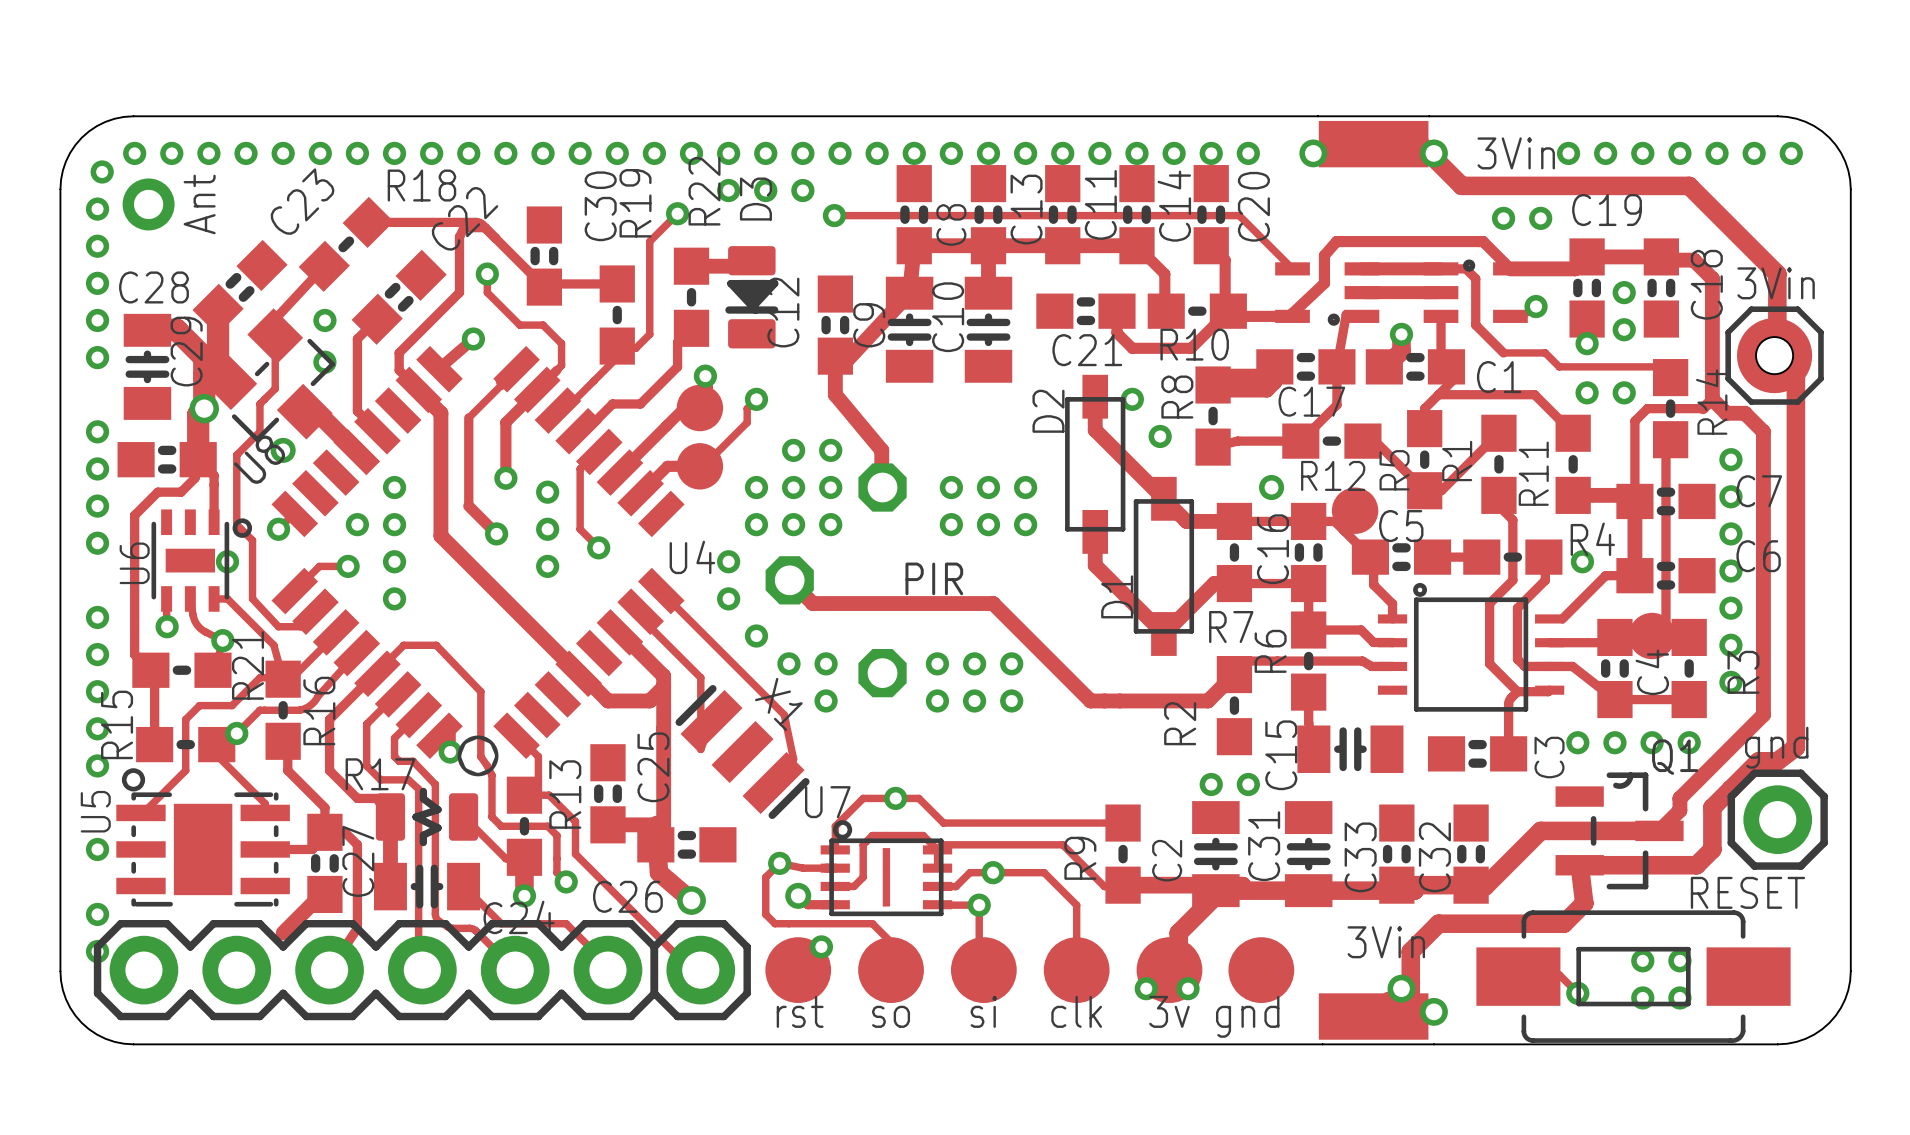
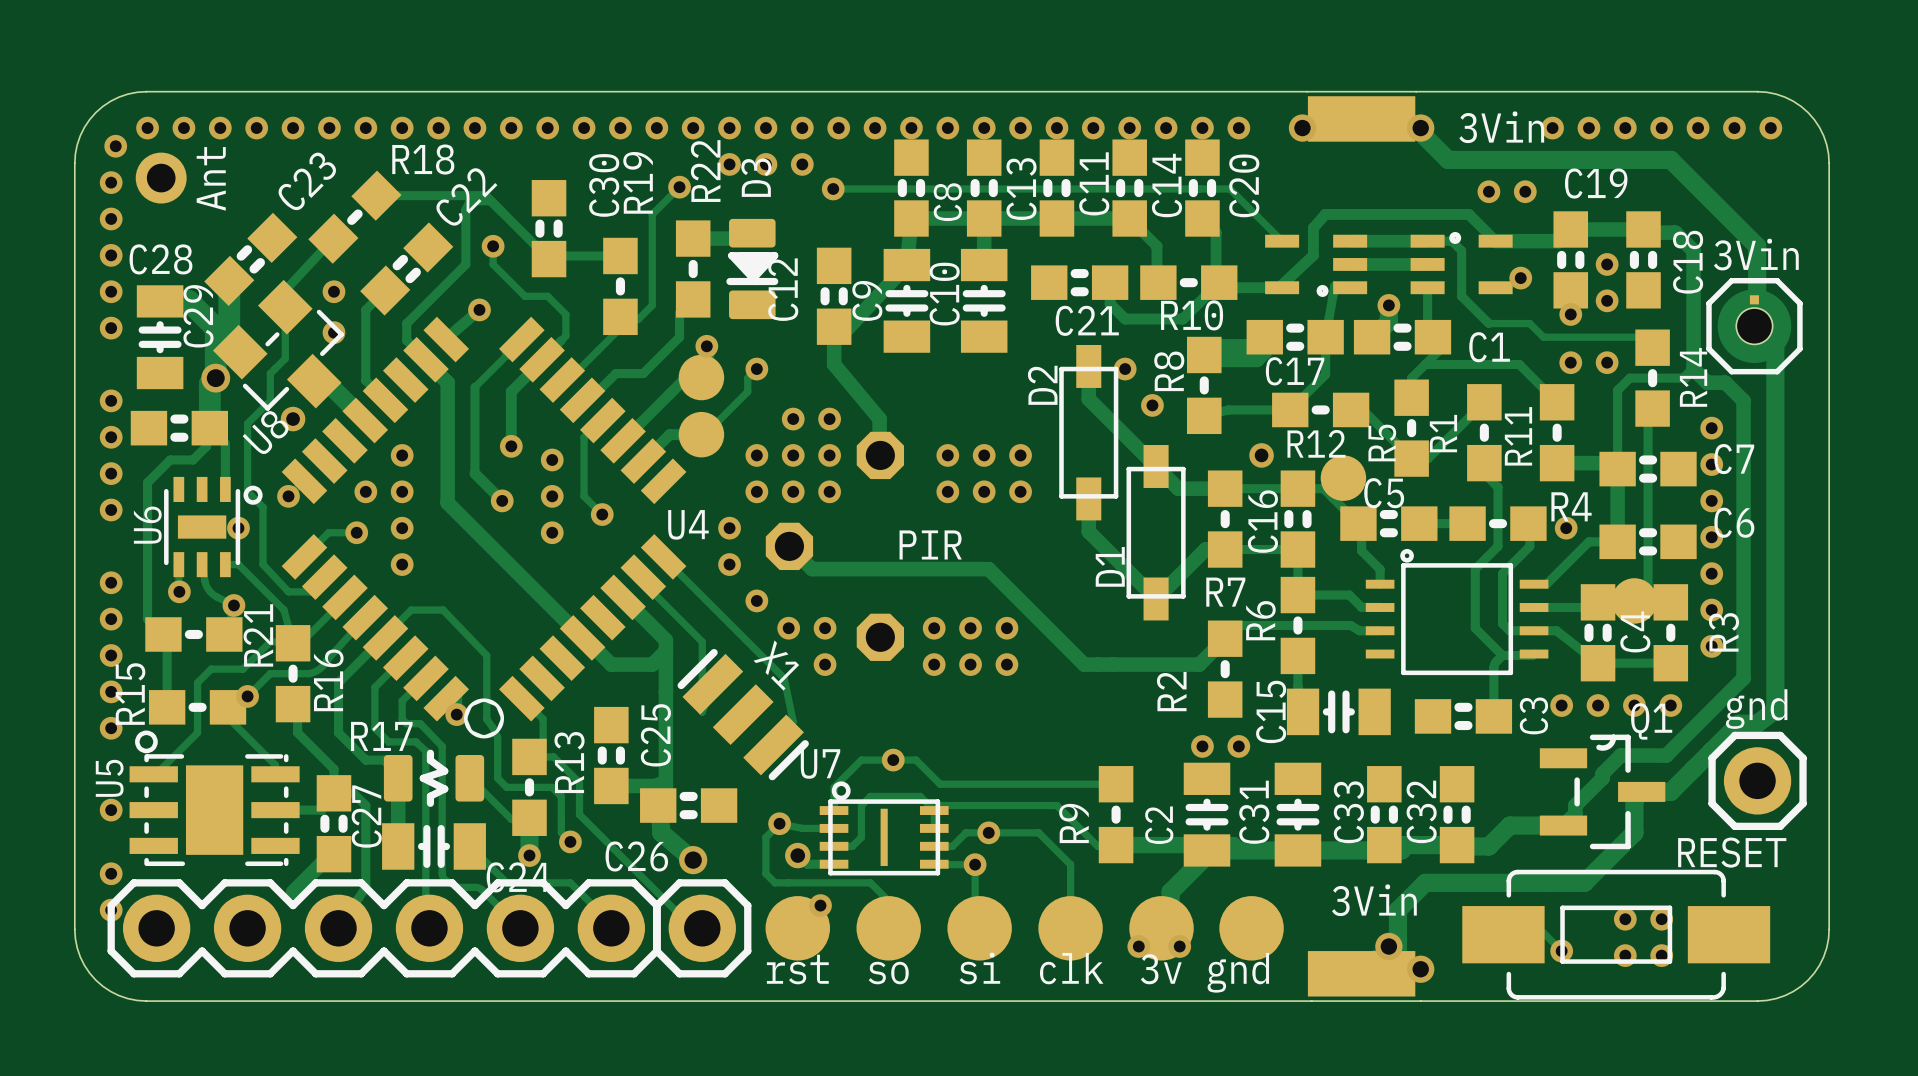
track: (1684, 793) (1679, 798) (1679, 810) (1659, 830) (1540, 830) (1485, 886) -> (1666, 755) (1620, 755) (1602, 773) (1602, 778) (1575, 805) (1575, 813) (1563, 825) (1509, 825) (1488, 846) (1470, 846)
track: (1712, 807) (1712, 849) (1696, 865) (1579, 865) (1584, 903) (1563, 923) -> (1693, 769) (1670, 791) (1641, 791) (1634, 799) (1634, 832) (1584, 882) (1548, 882)

